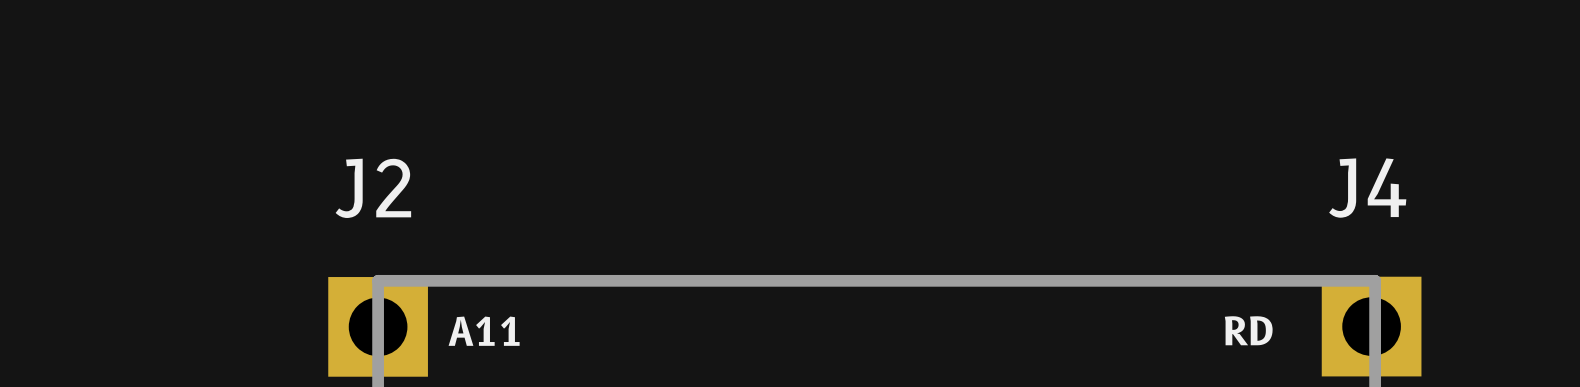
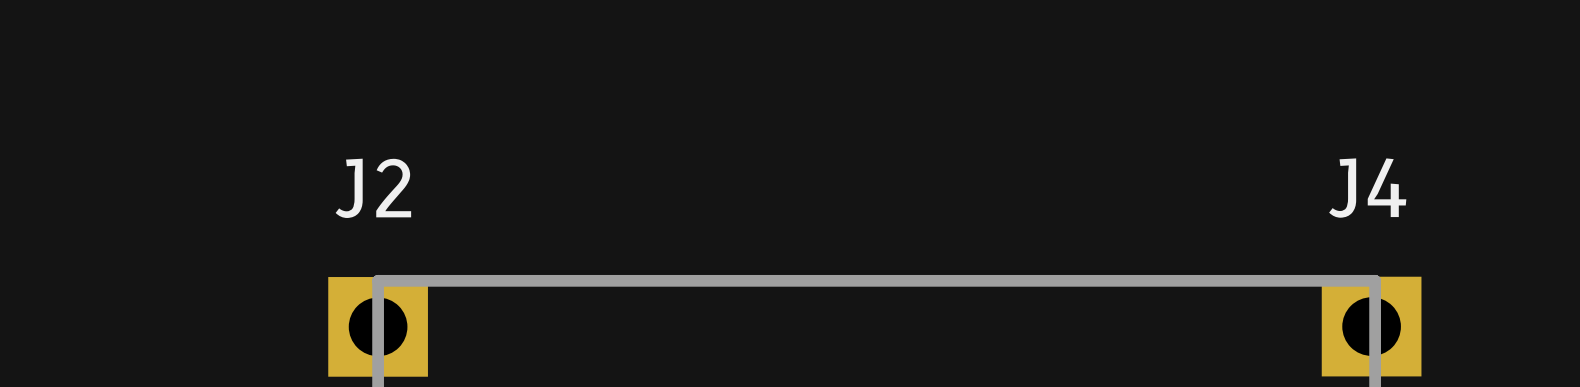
text: RD (1248, 330) -> none
text: A11 (484, 331) -> none

